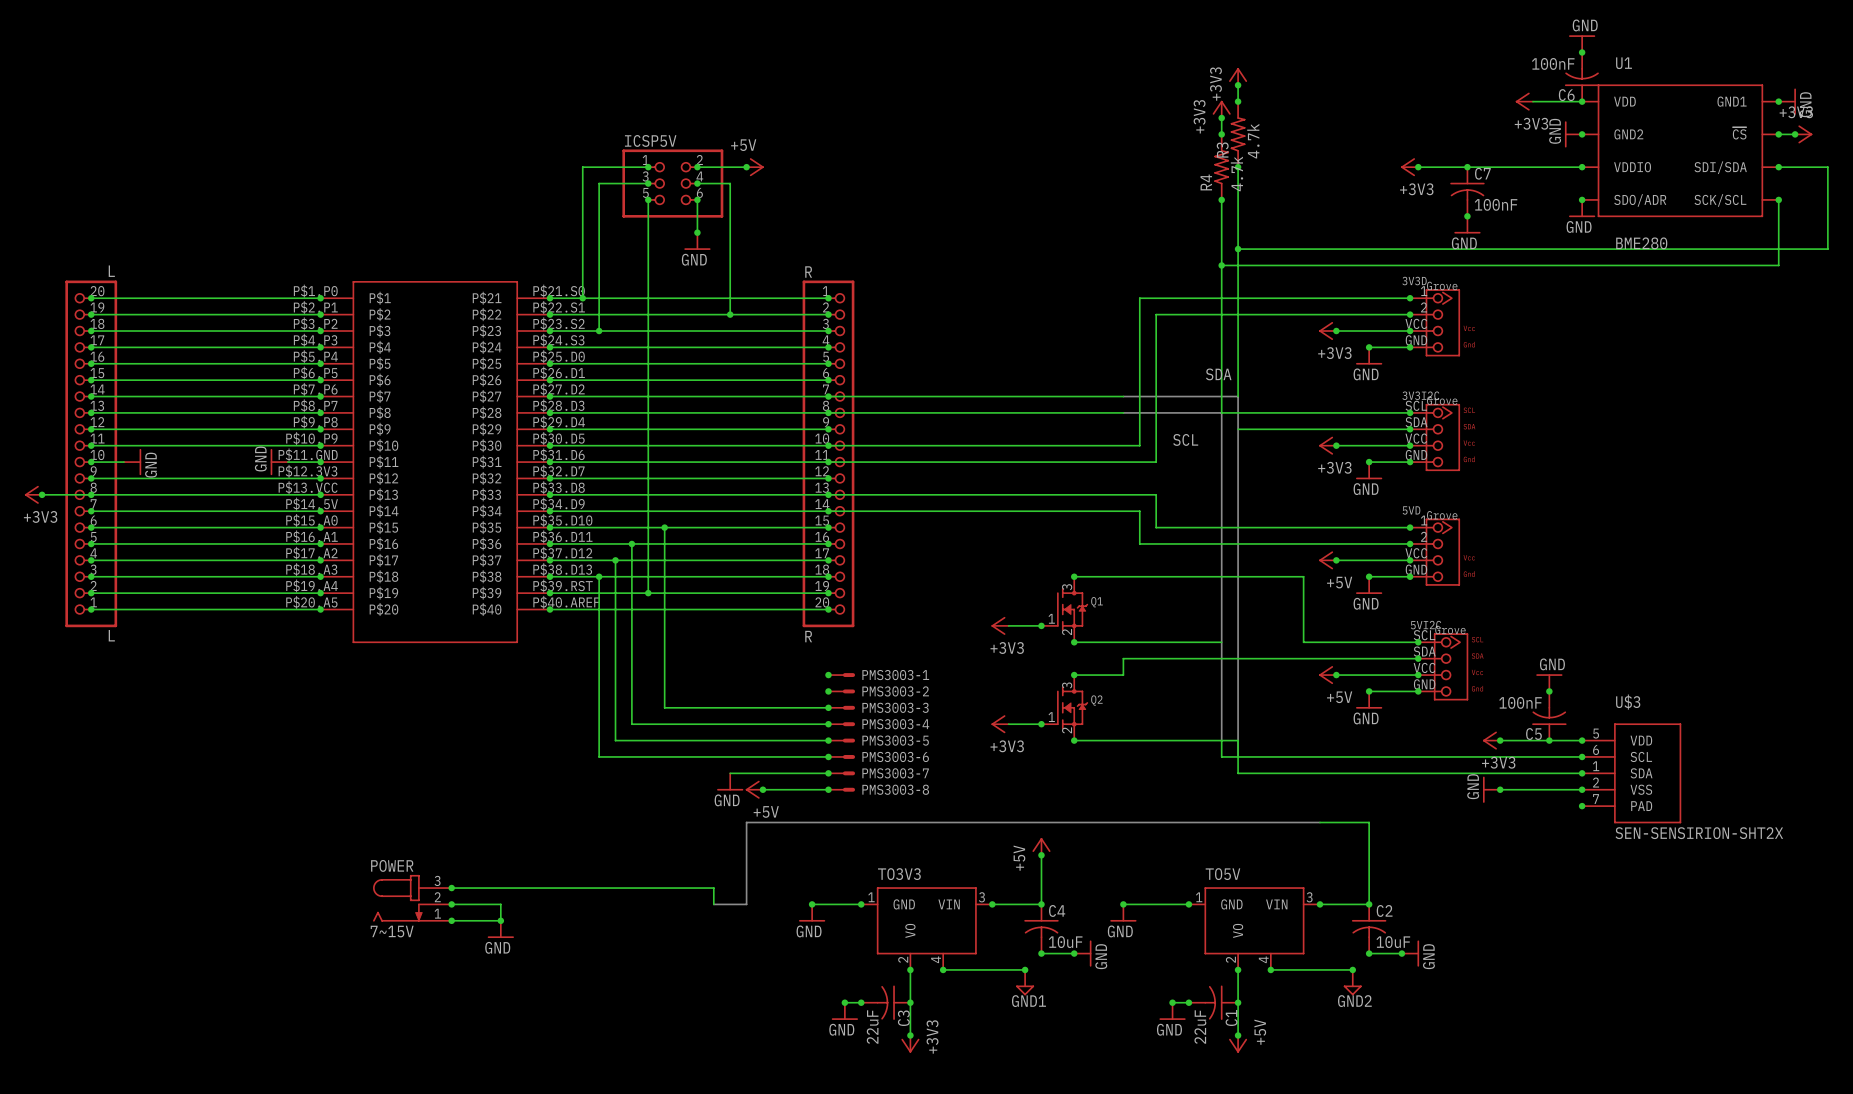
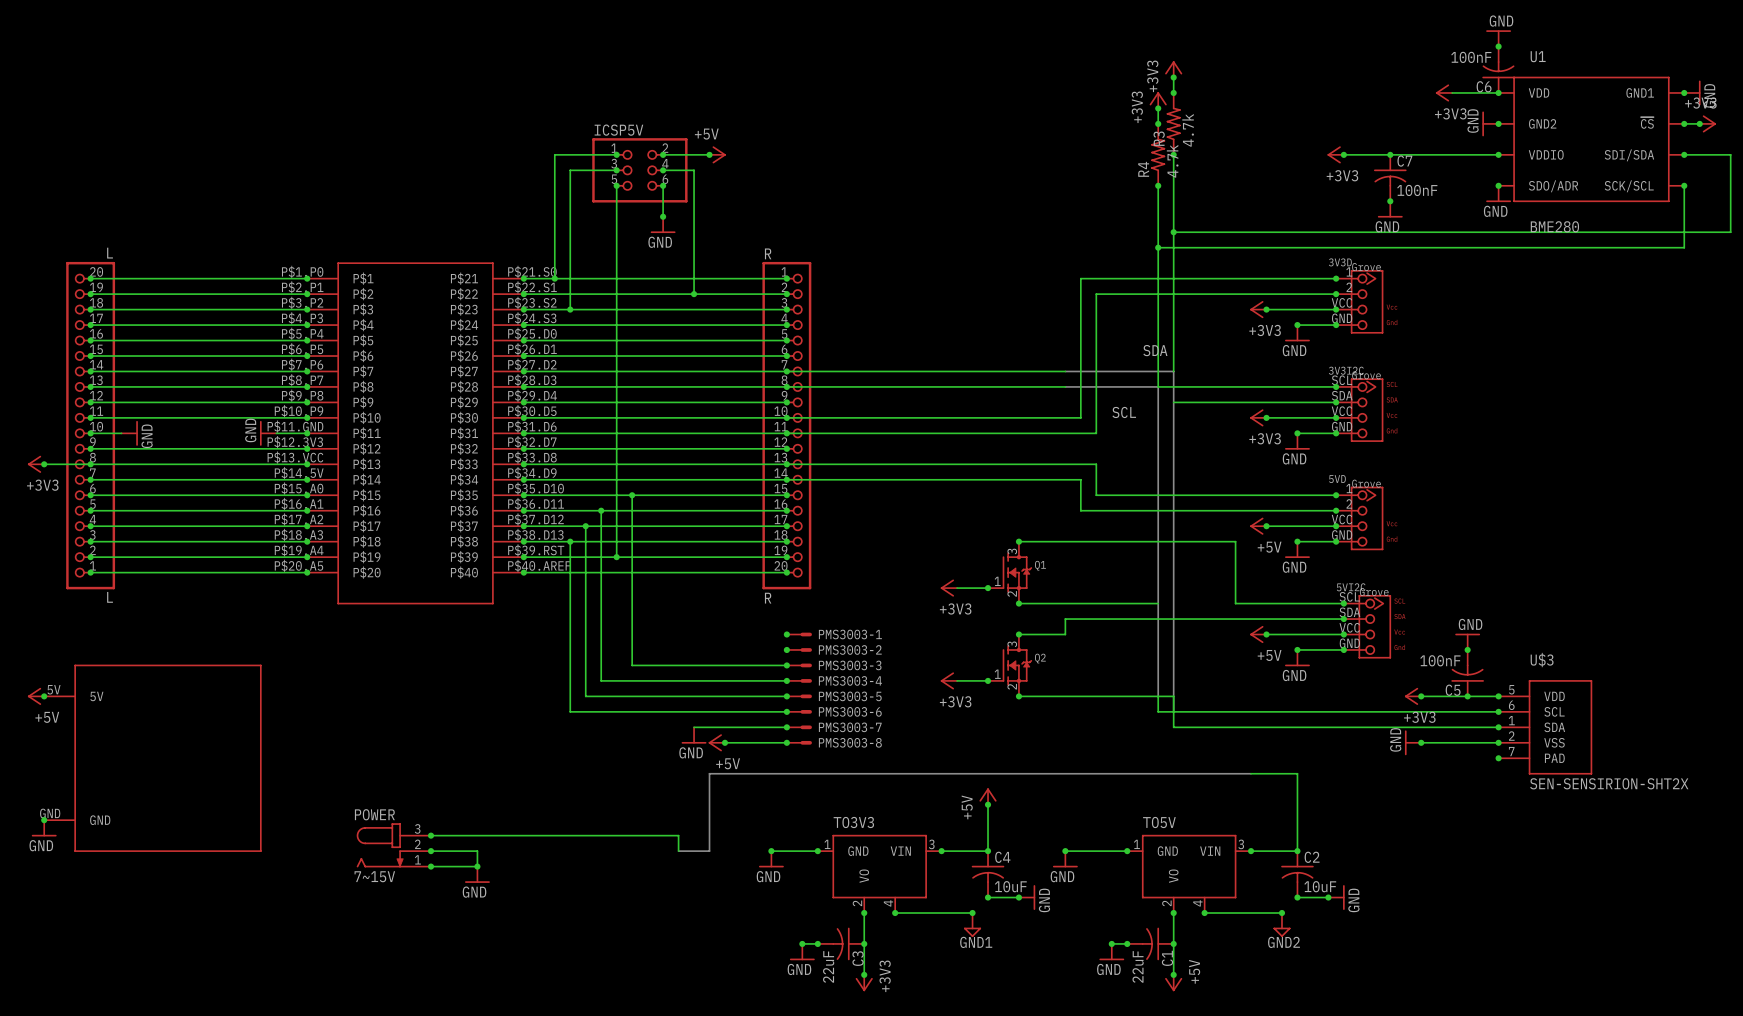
power symbol: none -> +5V (36, 696)
junction: none -> (44, 696)
part: none -> (152, 758)
junction: none -> (44, 820)
power symbol: none -> GND (44, 828)

